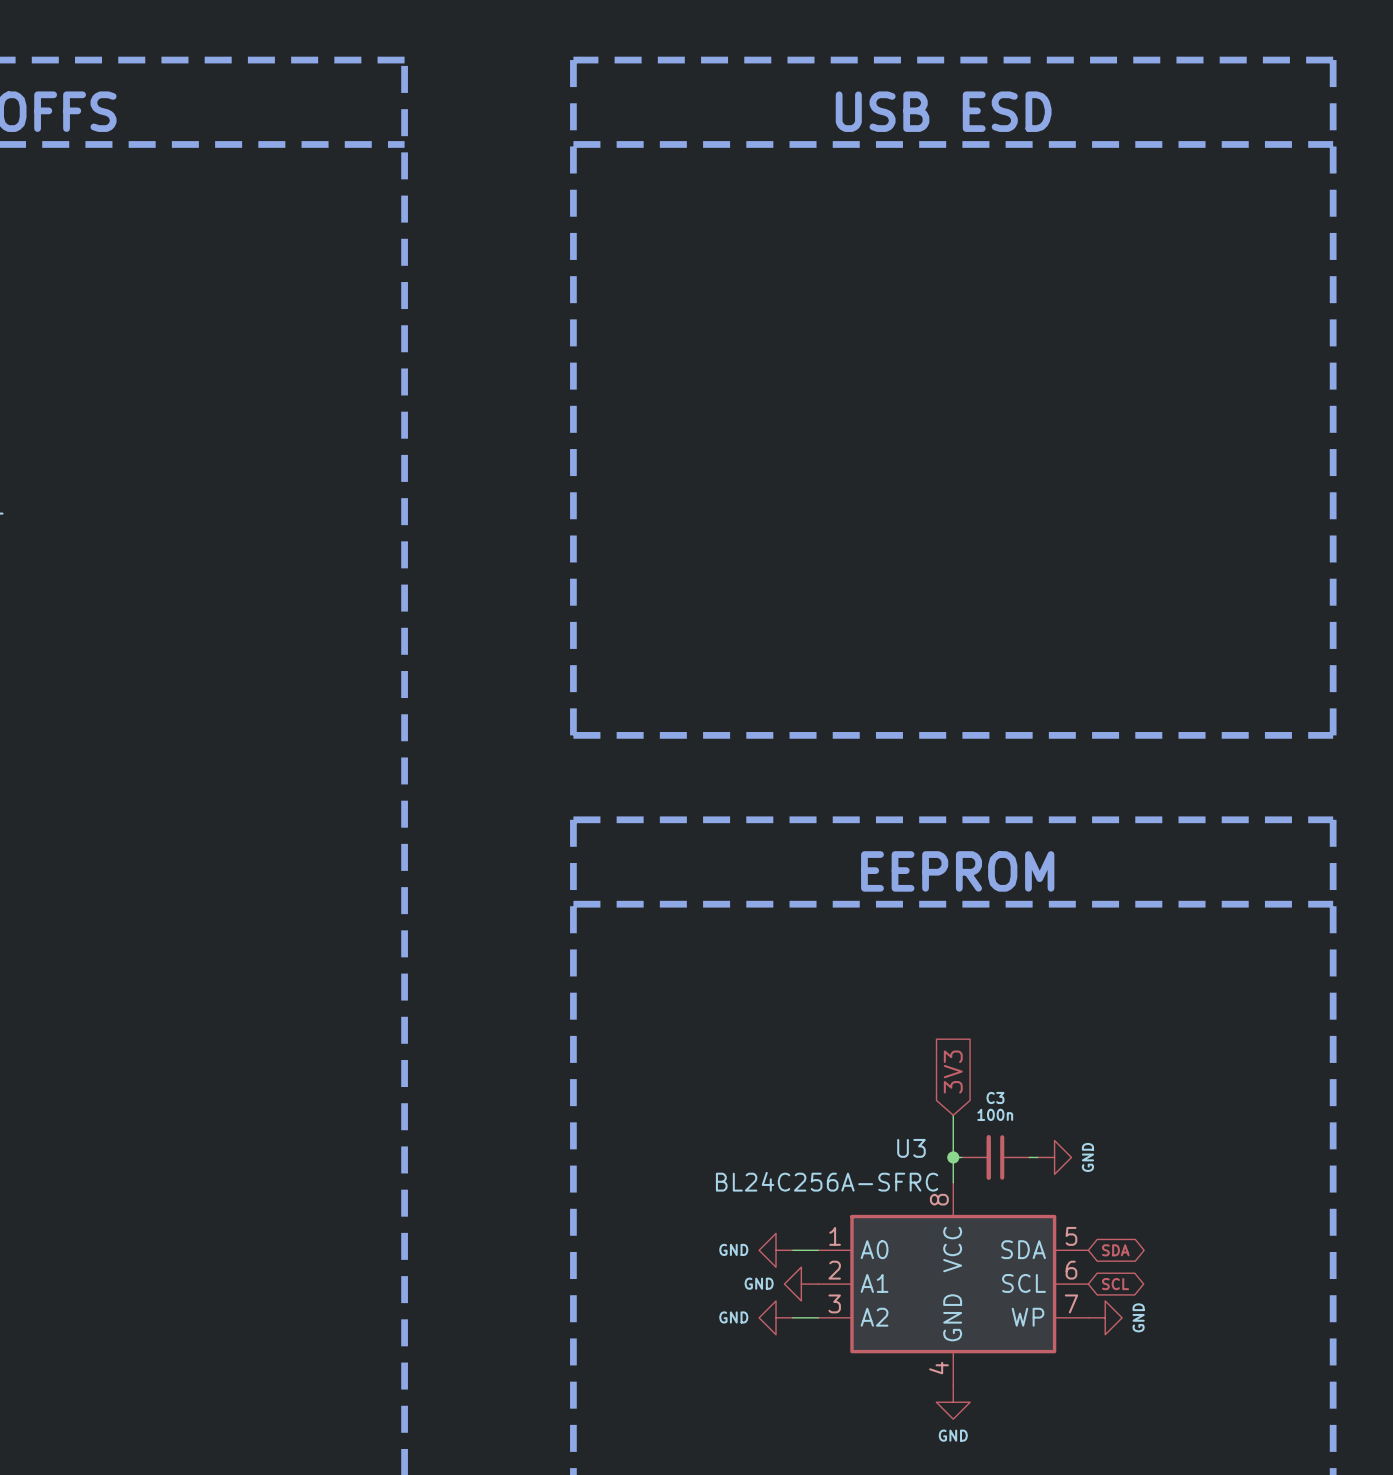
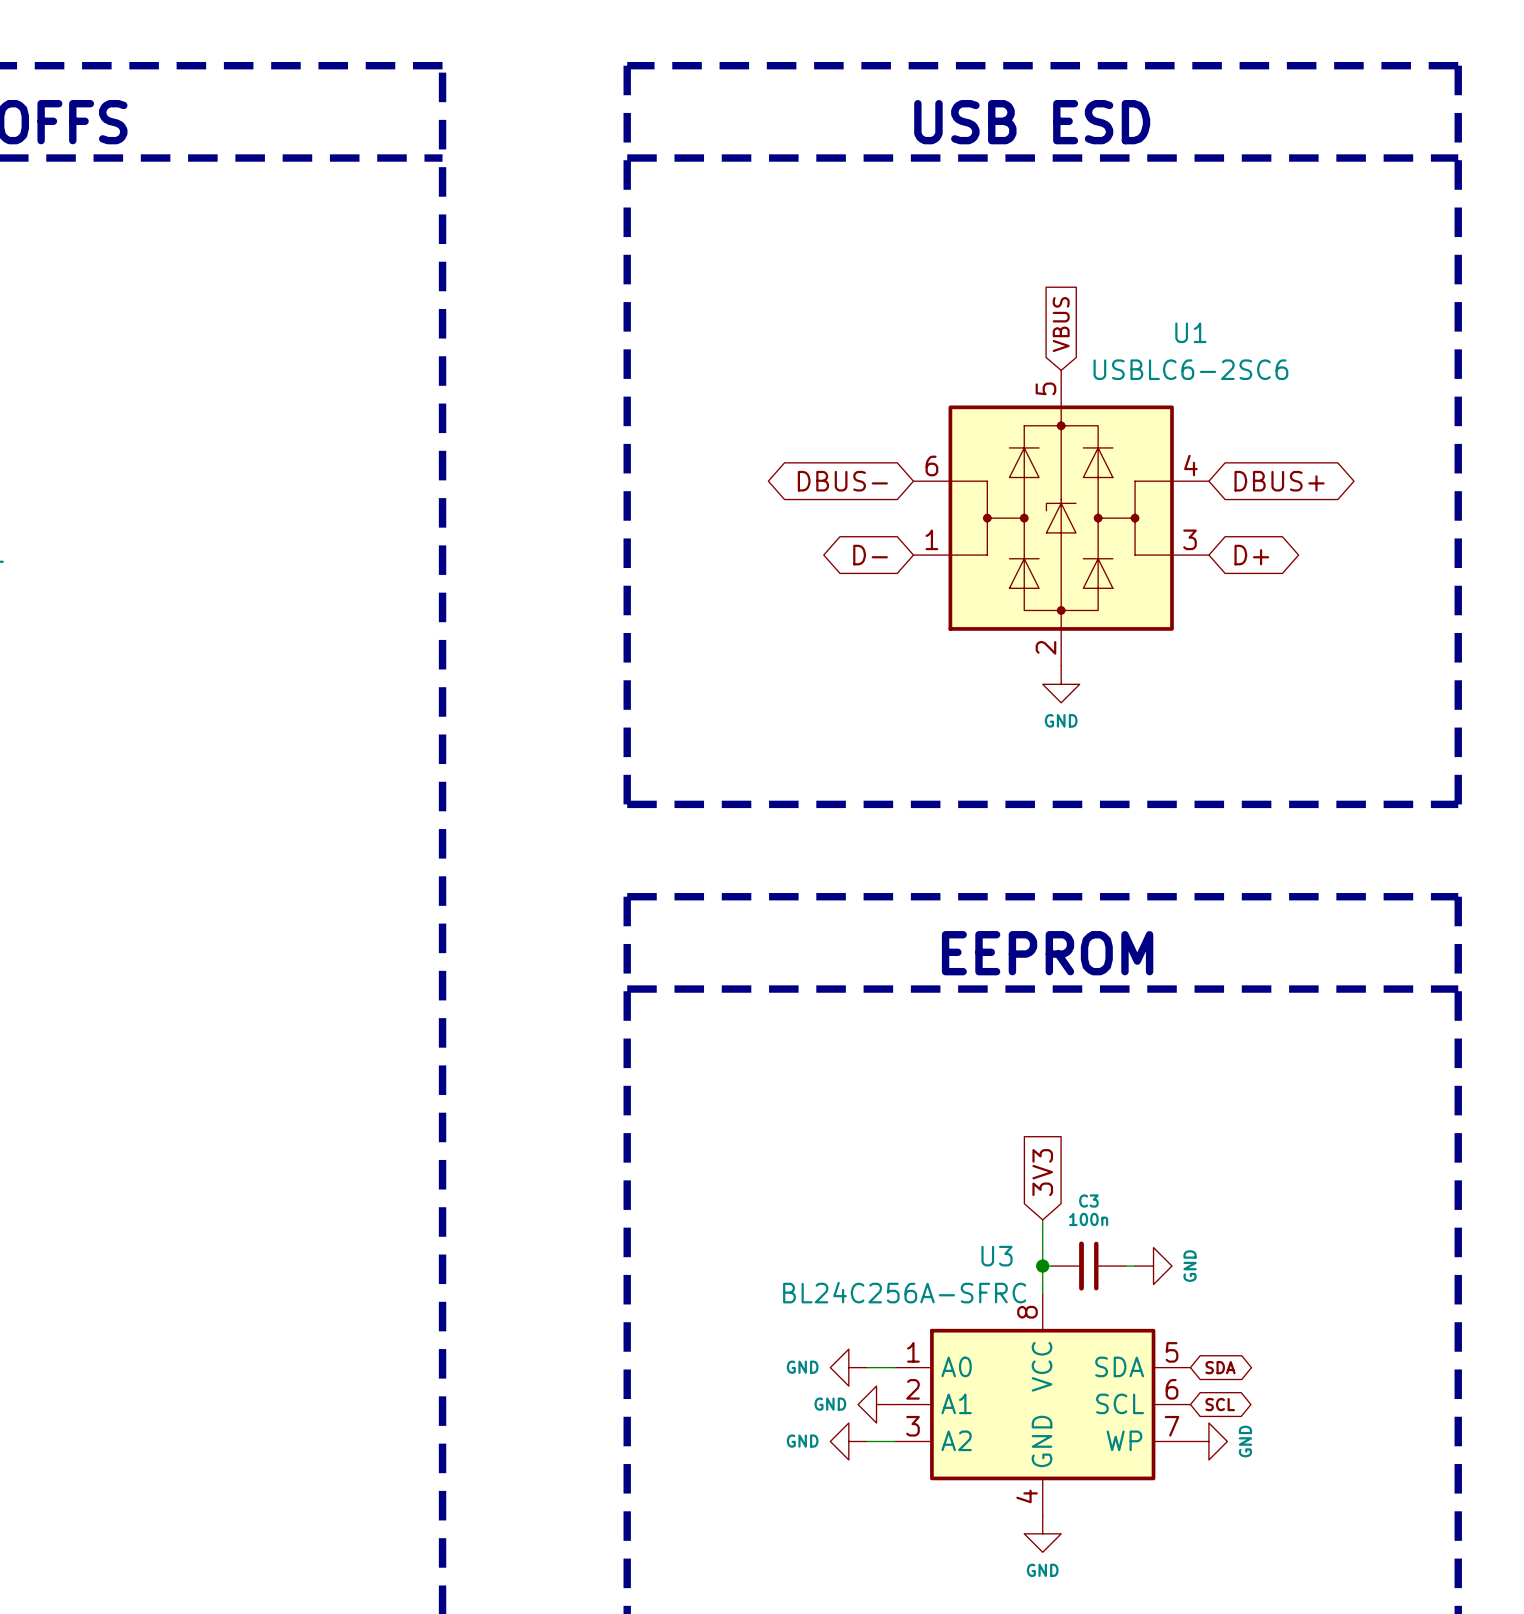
global label: none -> VBUS (1061, 324)
global label: none -> DBUS- (842, 481)
global label: none -> DBUS+ (1279, 481)
U1: none -> USBLC6-2SC6 (1061, 518)
global label: none -> D- (870, 555)
global label: none -> D+ (1251, 555)
power symbol: none -> GND (1061, 684)

